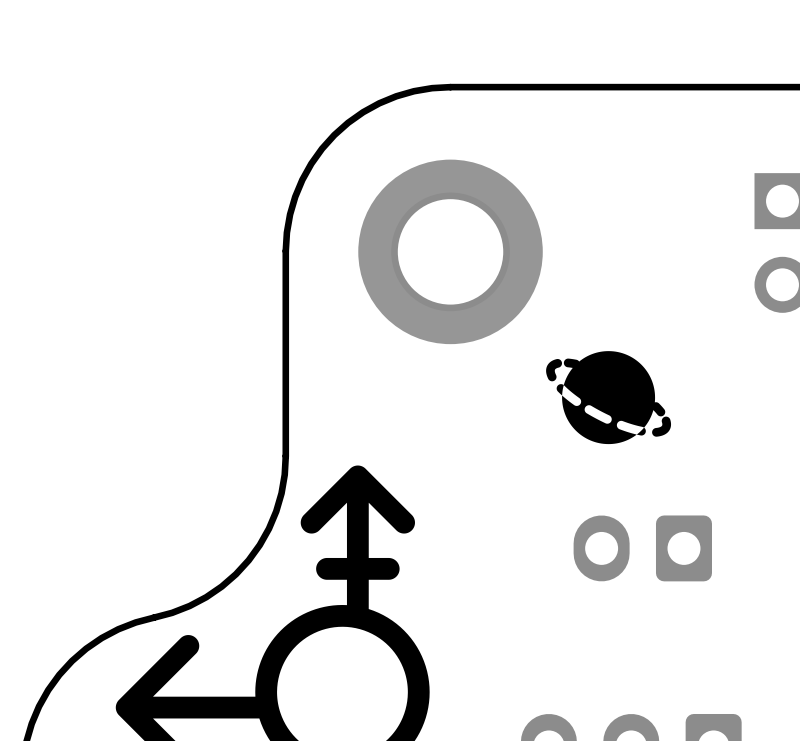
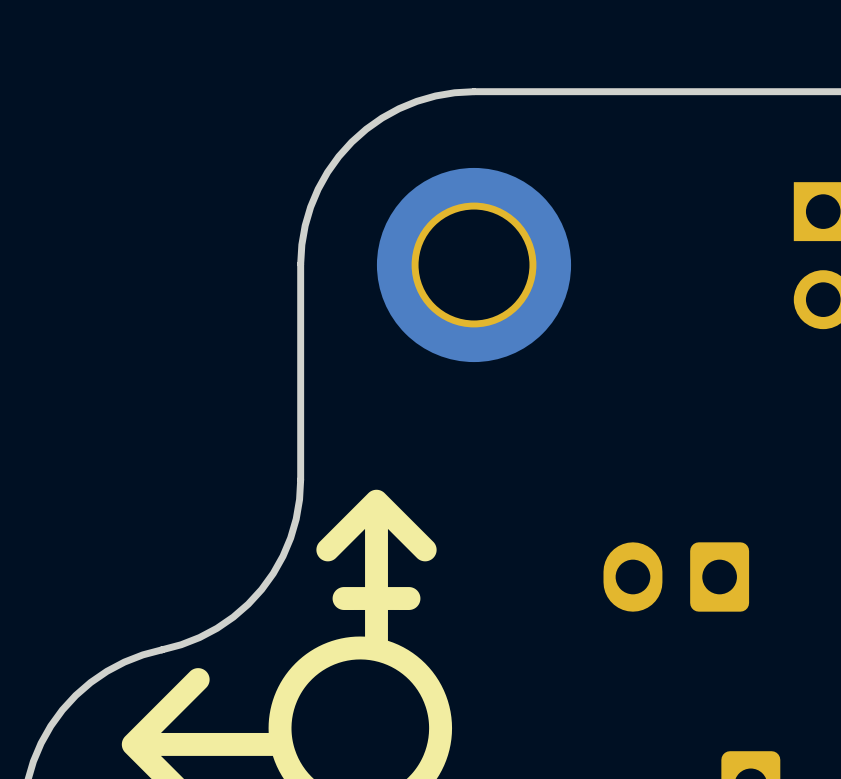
drawing: [546, 351, 672, 445] -> none

